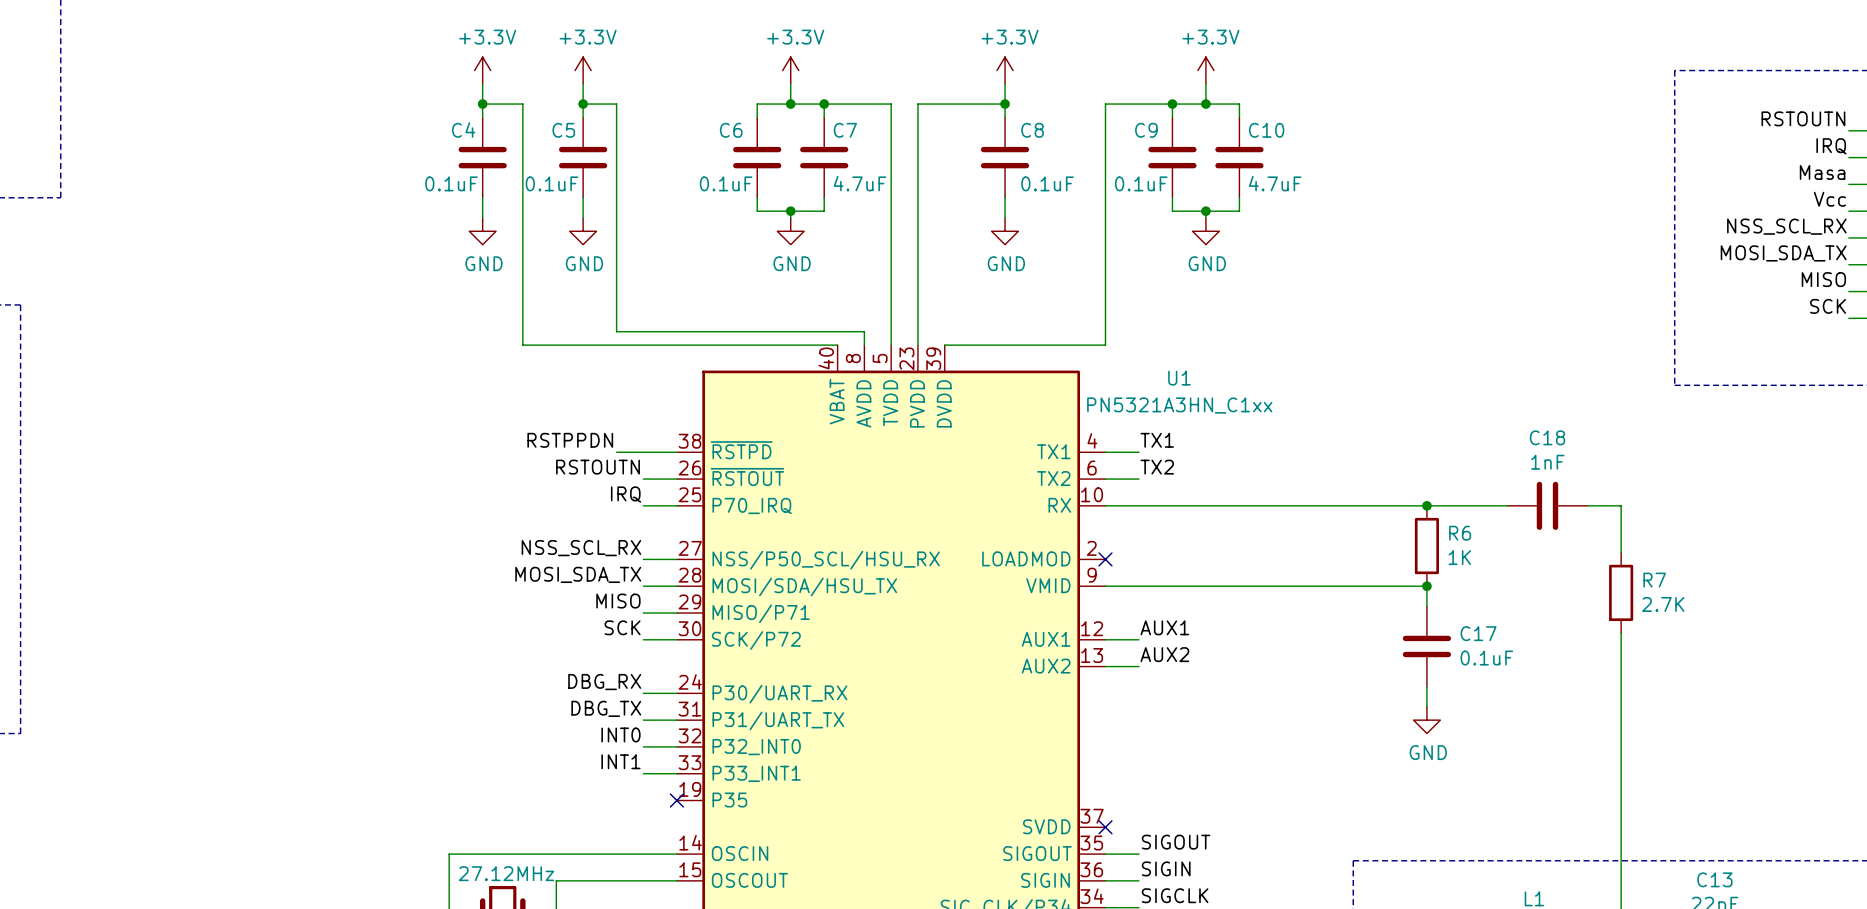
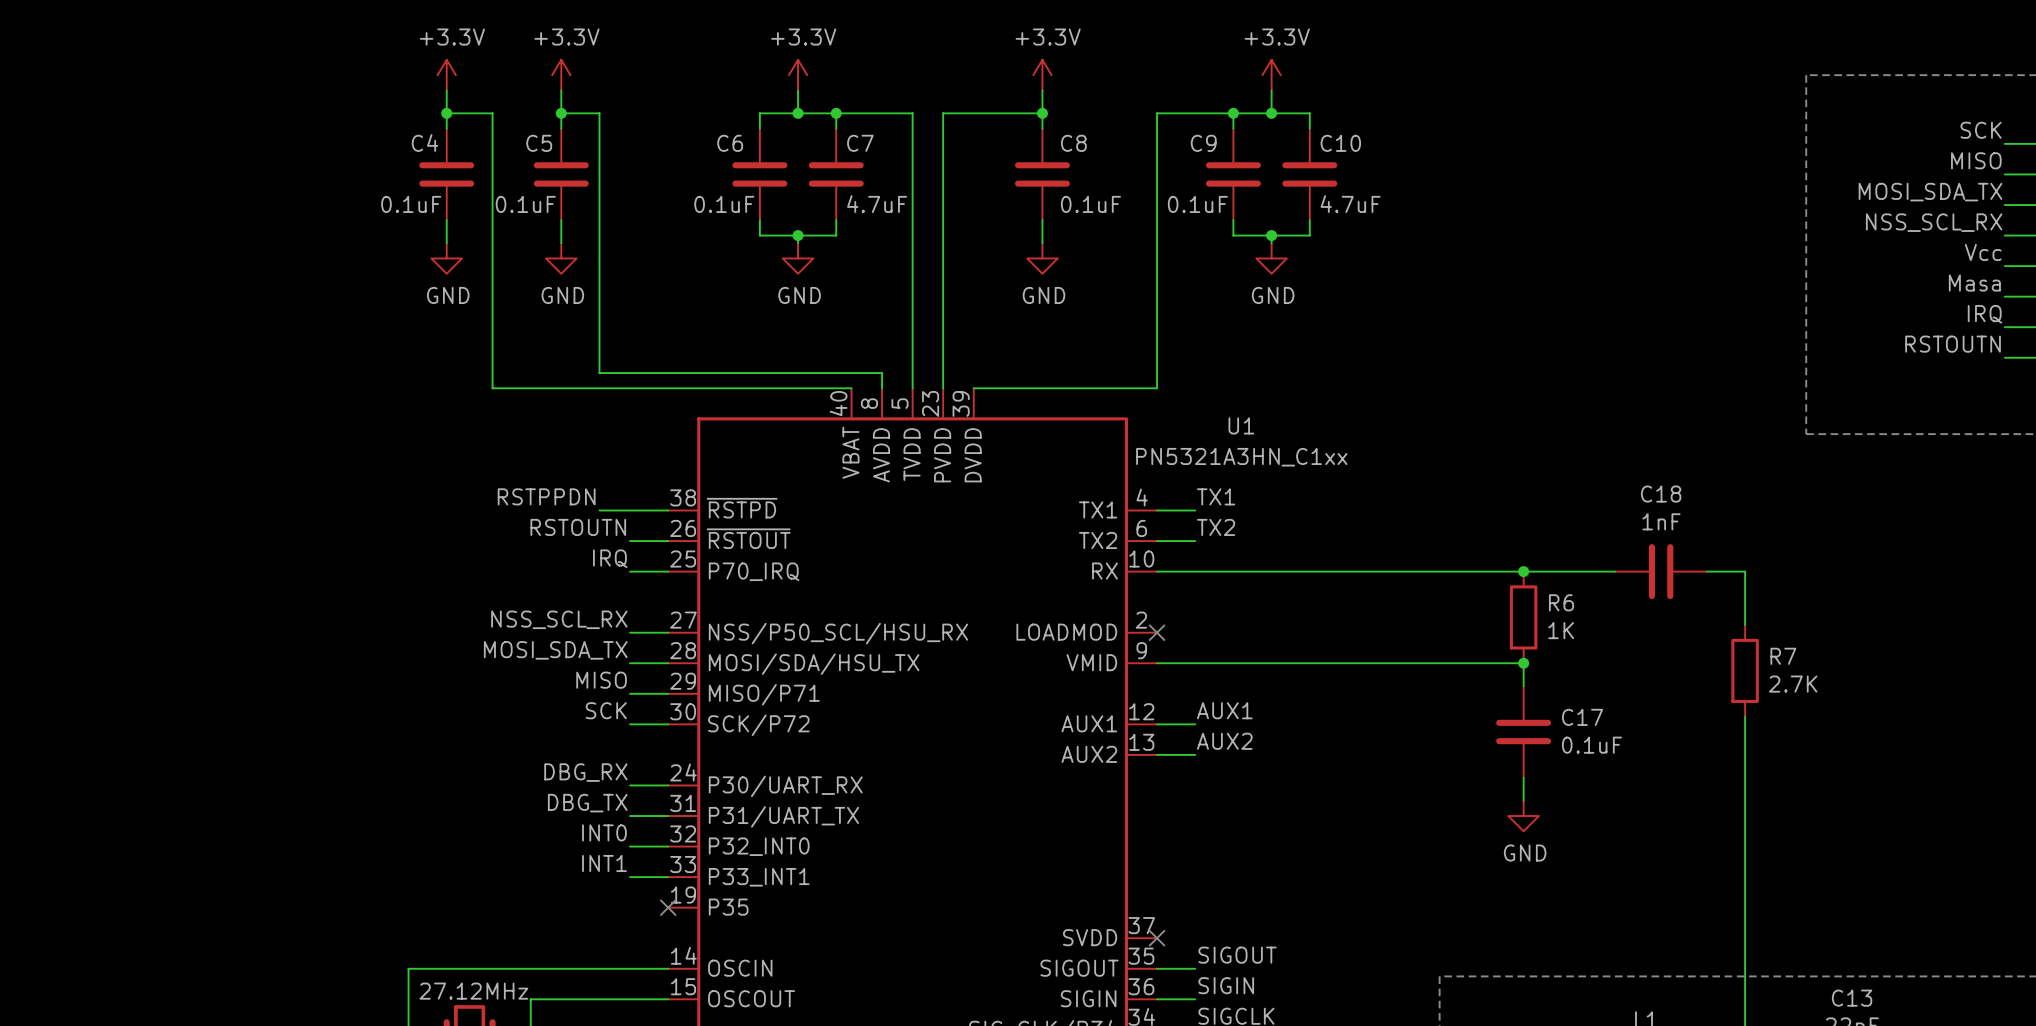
label: RSTOUTN (1803, 118) -> SCK (1981, 130)
label: IRQ (1831, 146) -> MISO (1976, 160)
label: Masa (1822, 172) -> MOSI_SDA_TX (1930, 192)
label: Vcc (1829, 199) -> NSS_SCL_RX (1934, 222)
label: NSS_SCL_RX (1786, 226) -> Vcc (1983, 252)
label: MOSI_SDA_TX (1783, 253) -> Masa (1974, 283)
label: MISO (1823, 279) -> IRQ (1985, 314)
label: SCK (1828, 306) -> RSTOUTN (1953, 344)

